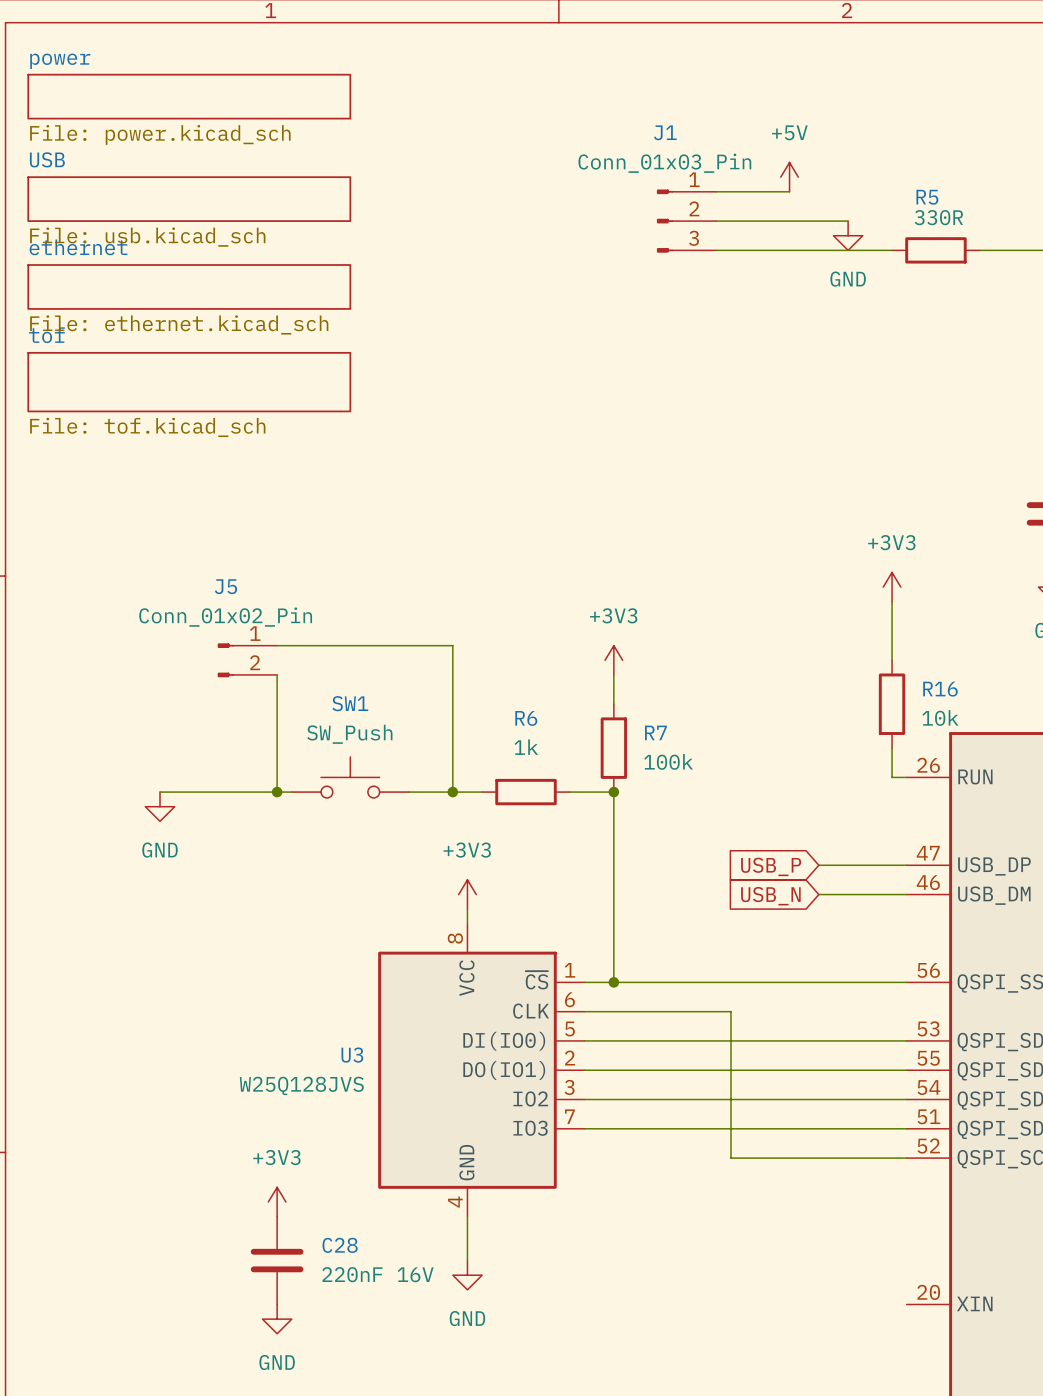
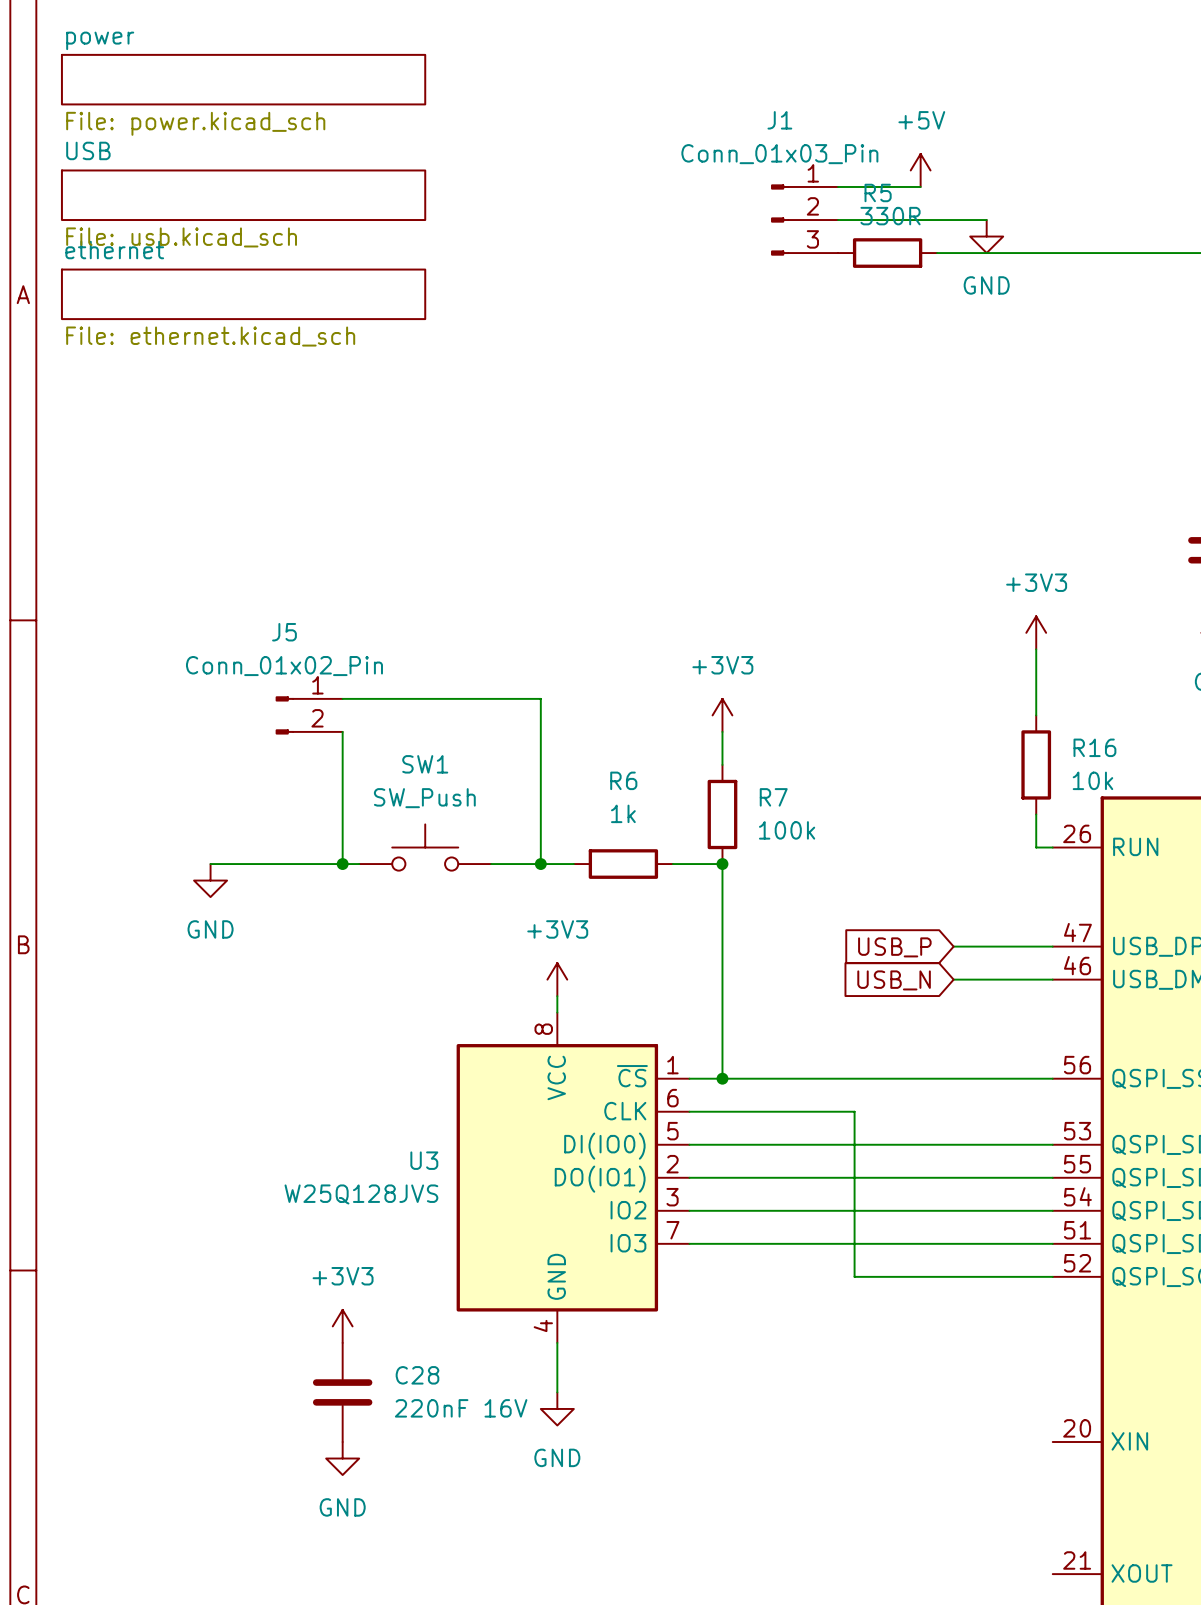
wire: (716, 250) (804, 250) -> (1036, 253) (1135, 253)
R5 position: (935, 250) -> (887, 253)
sheet tof: File: tof.kicad_sch (189, 382) -> none

